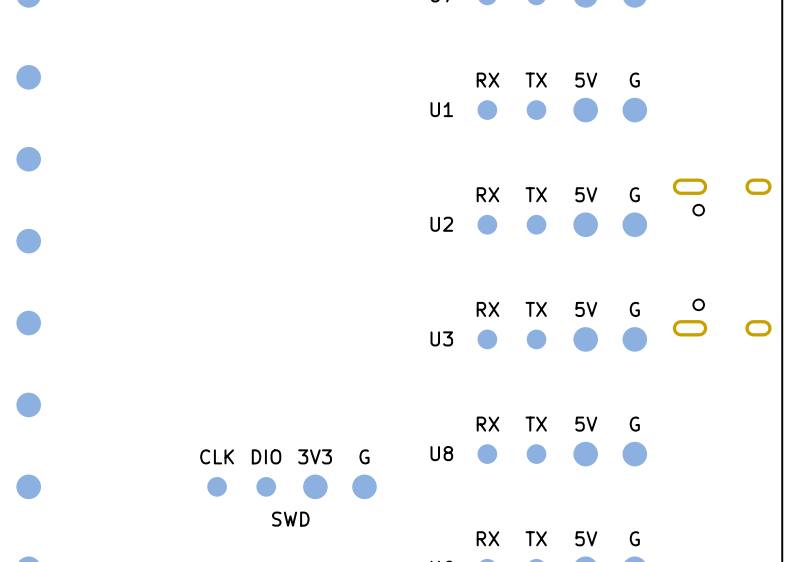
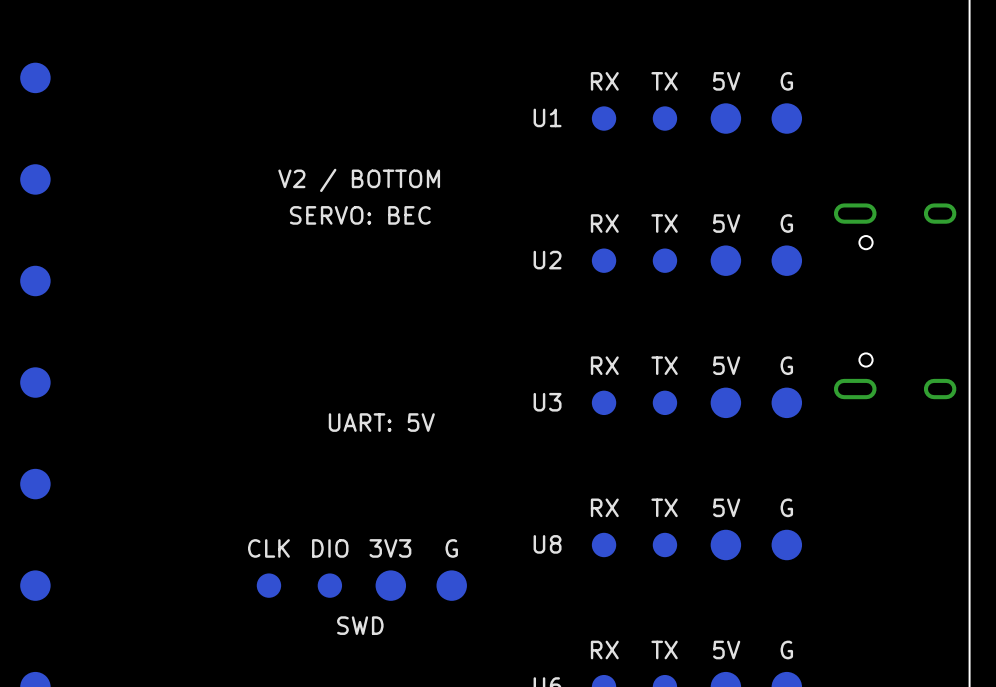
text: none -> V2 / BOTTOM (359, 180)
text: none -> SERVO: BEC (360, 215)
text: none -> UART: 5V (381, 422)

